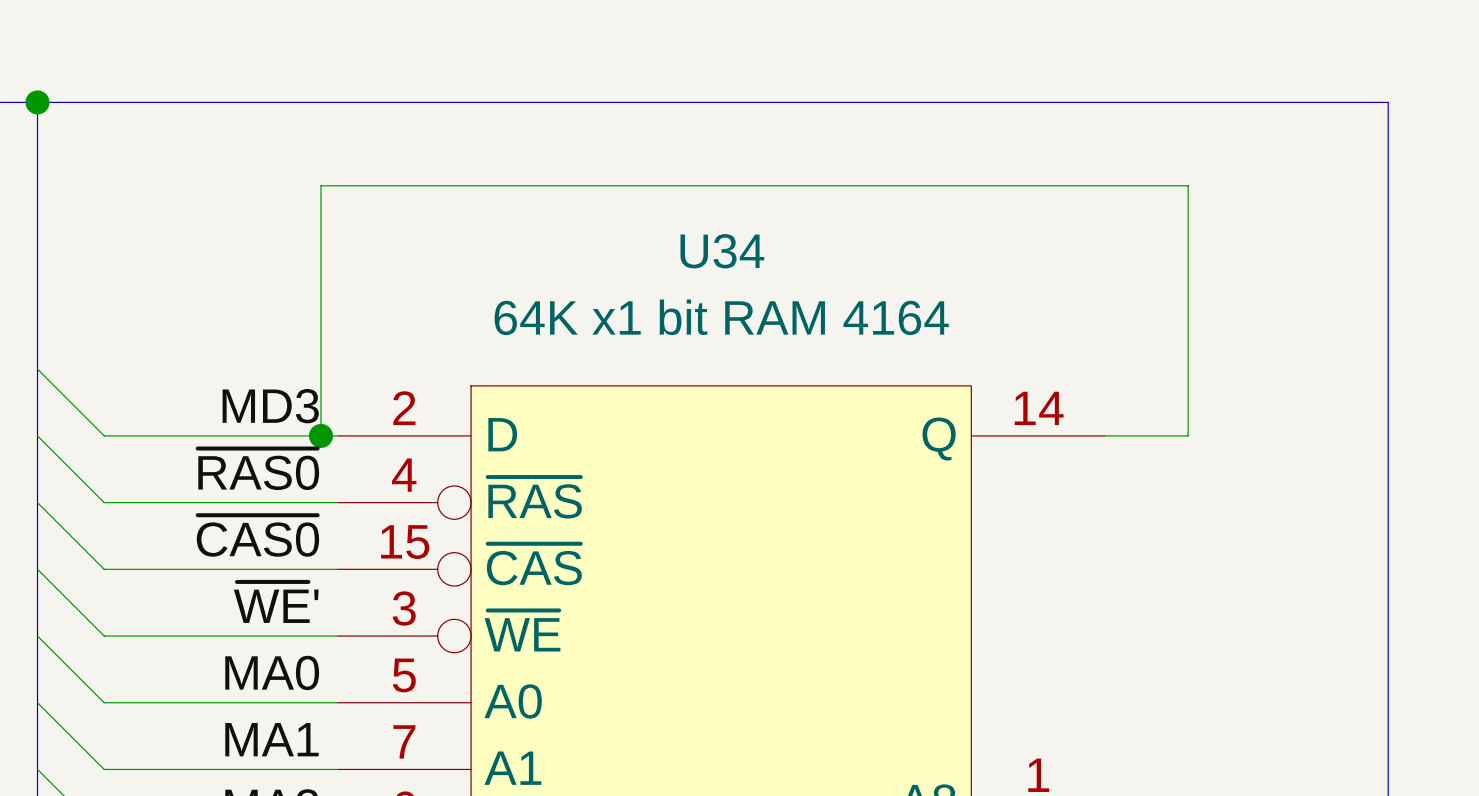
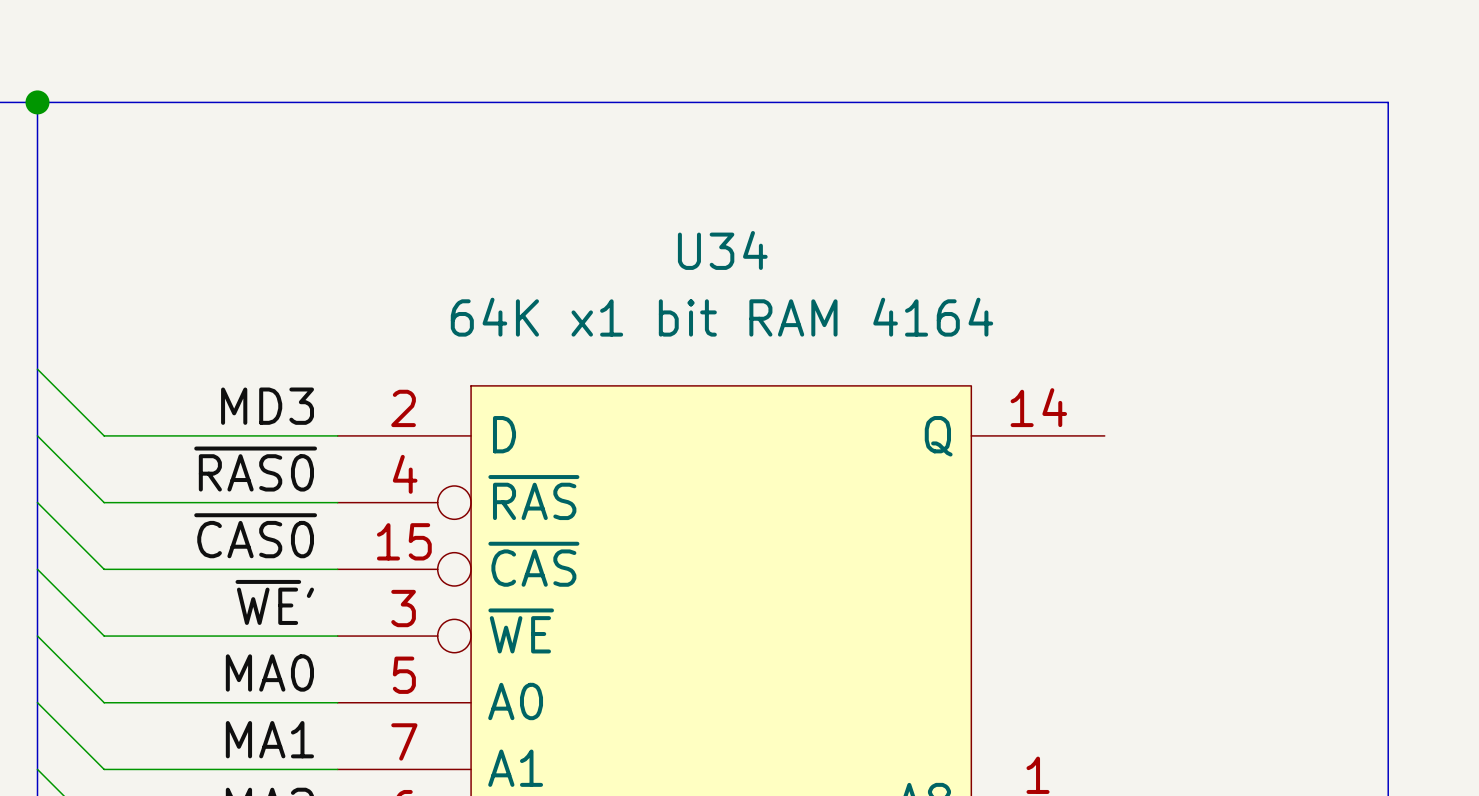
wire: (320, 435) (320, 185) (1188, 185) (1188, 435) (1104, 435) -> none
junction: (320, 435) -> none

